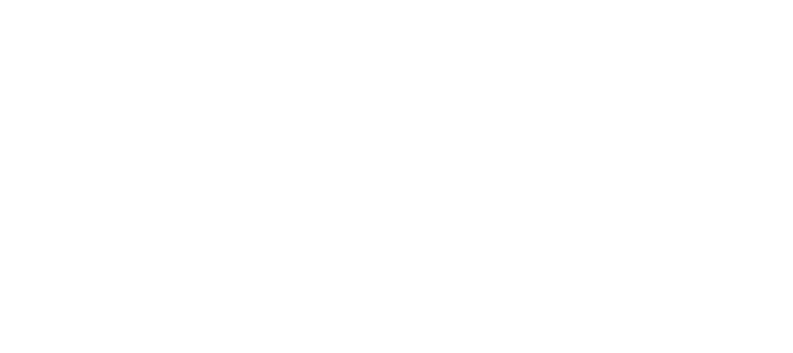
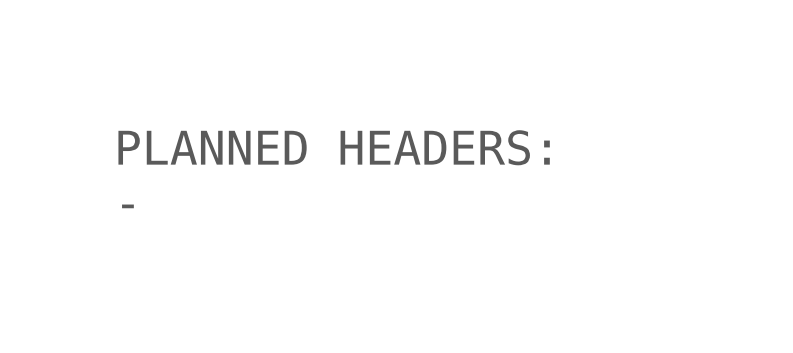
text: none -> PLANNED HEADERS: (334, 147)
text: none -> - (127, 206)

